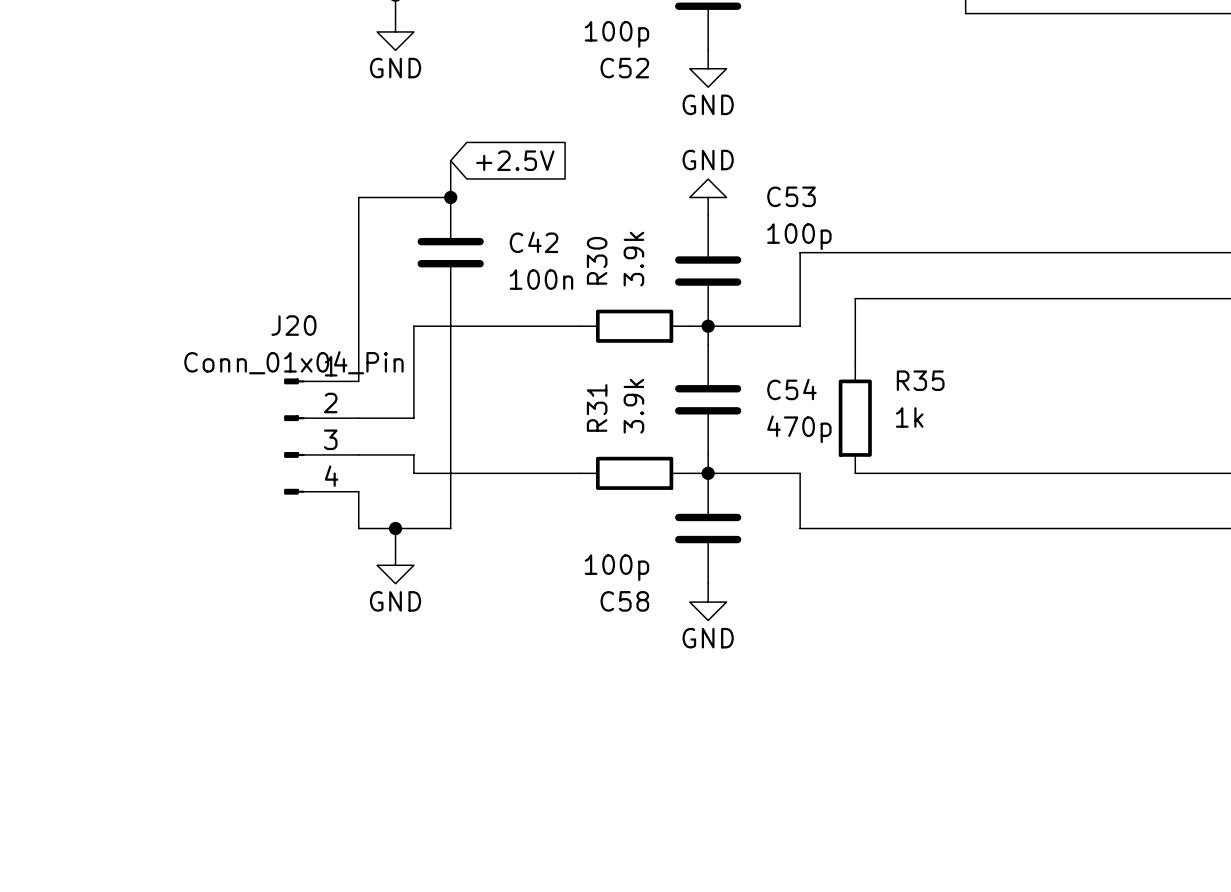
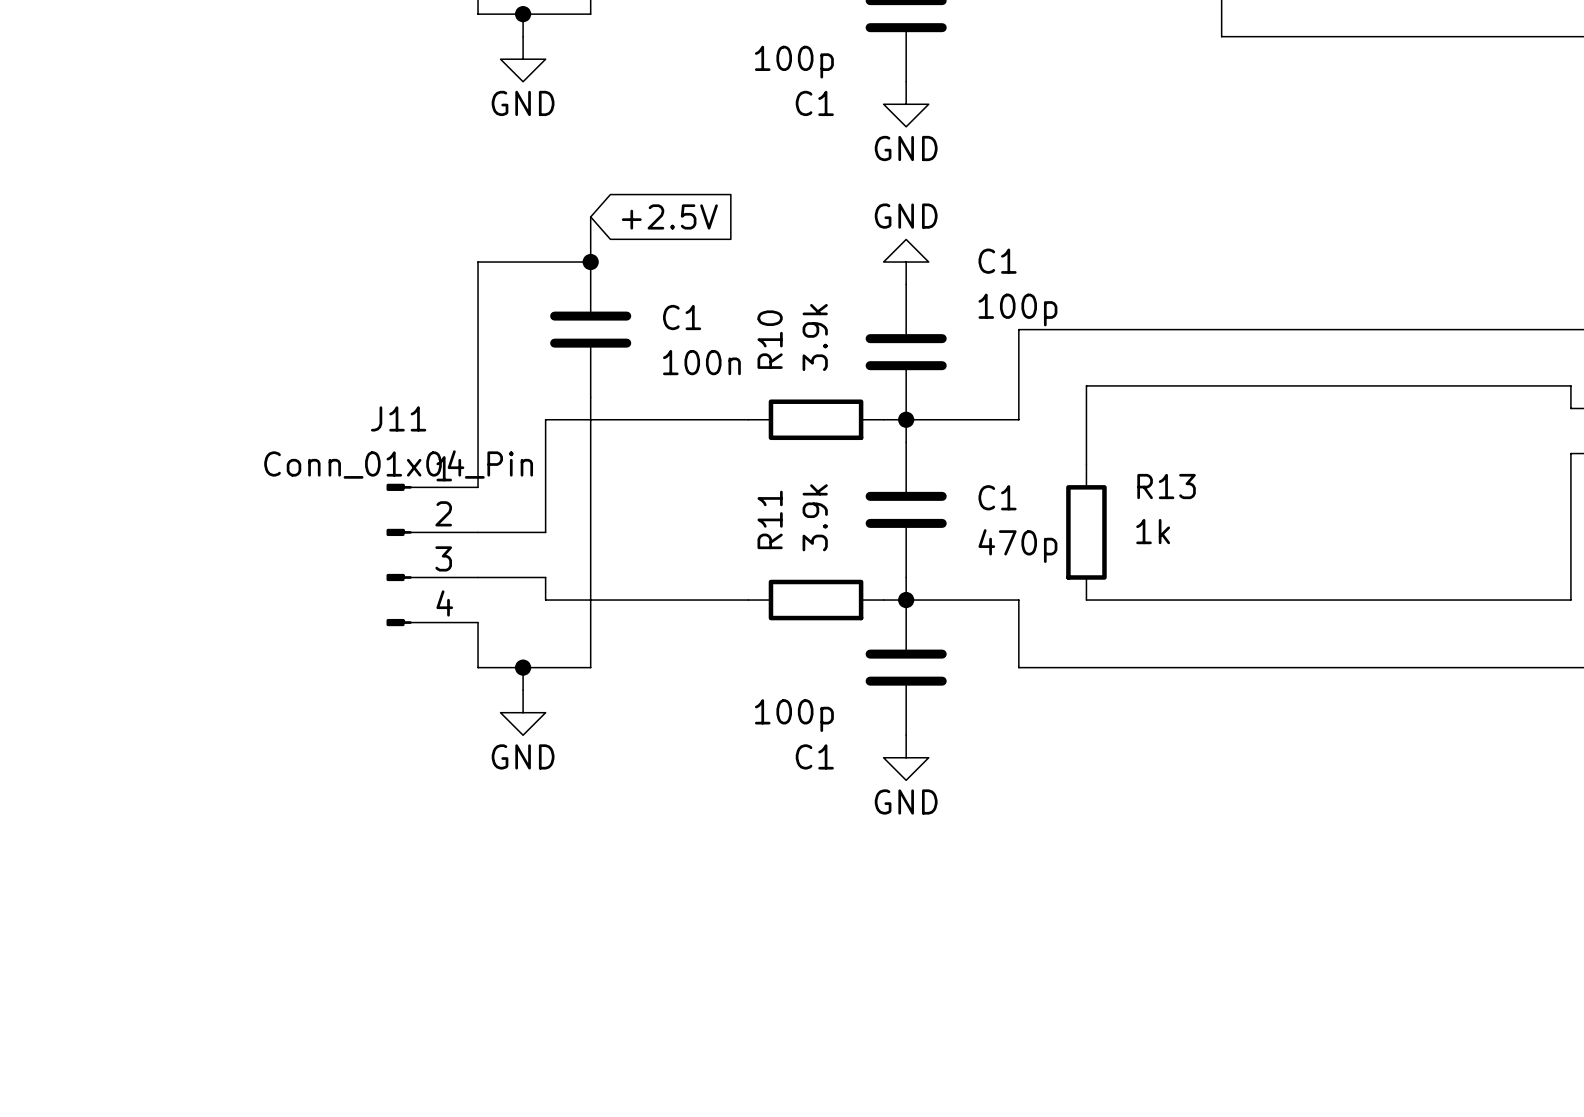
C52 name: C52 (624, 68) -> C1 (814, 103)
C53 name: C53 (791, 196) -> C1 (997, 261)
C42 name: C42 (534, 242) -> C1 (682, 317)
R30 name: R30 (597, 260) -> R10 (770, 339)
J20 name: J20 (293, 325) -> J11 (398, 418)
R35 name: R35 (920, 380) -> R13 (1166, 486)
C54 name: C54 (791, 389) -> C1 (997, 497)
R31 name: R31 (597, 407) -> R11 (770, 519)
C58 name: C58 (624, 601) -> C1 (814, 756)

